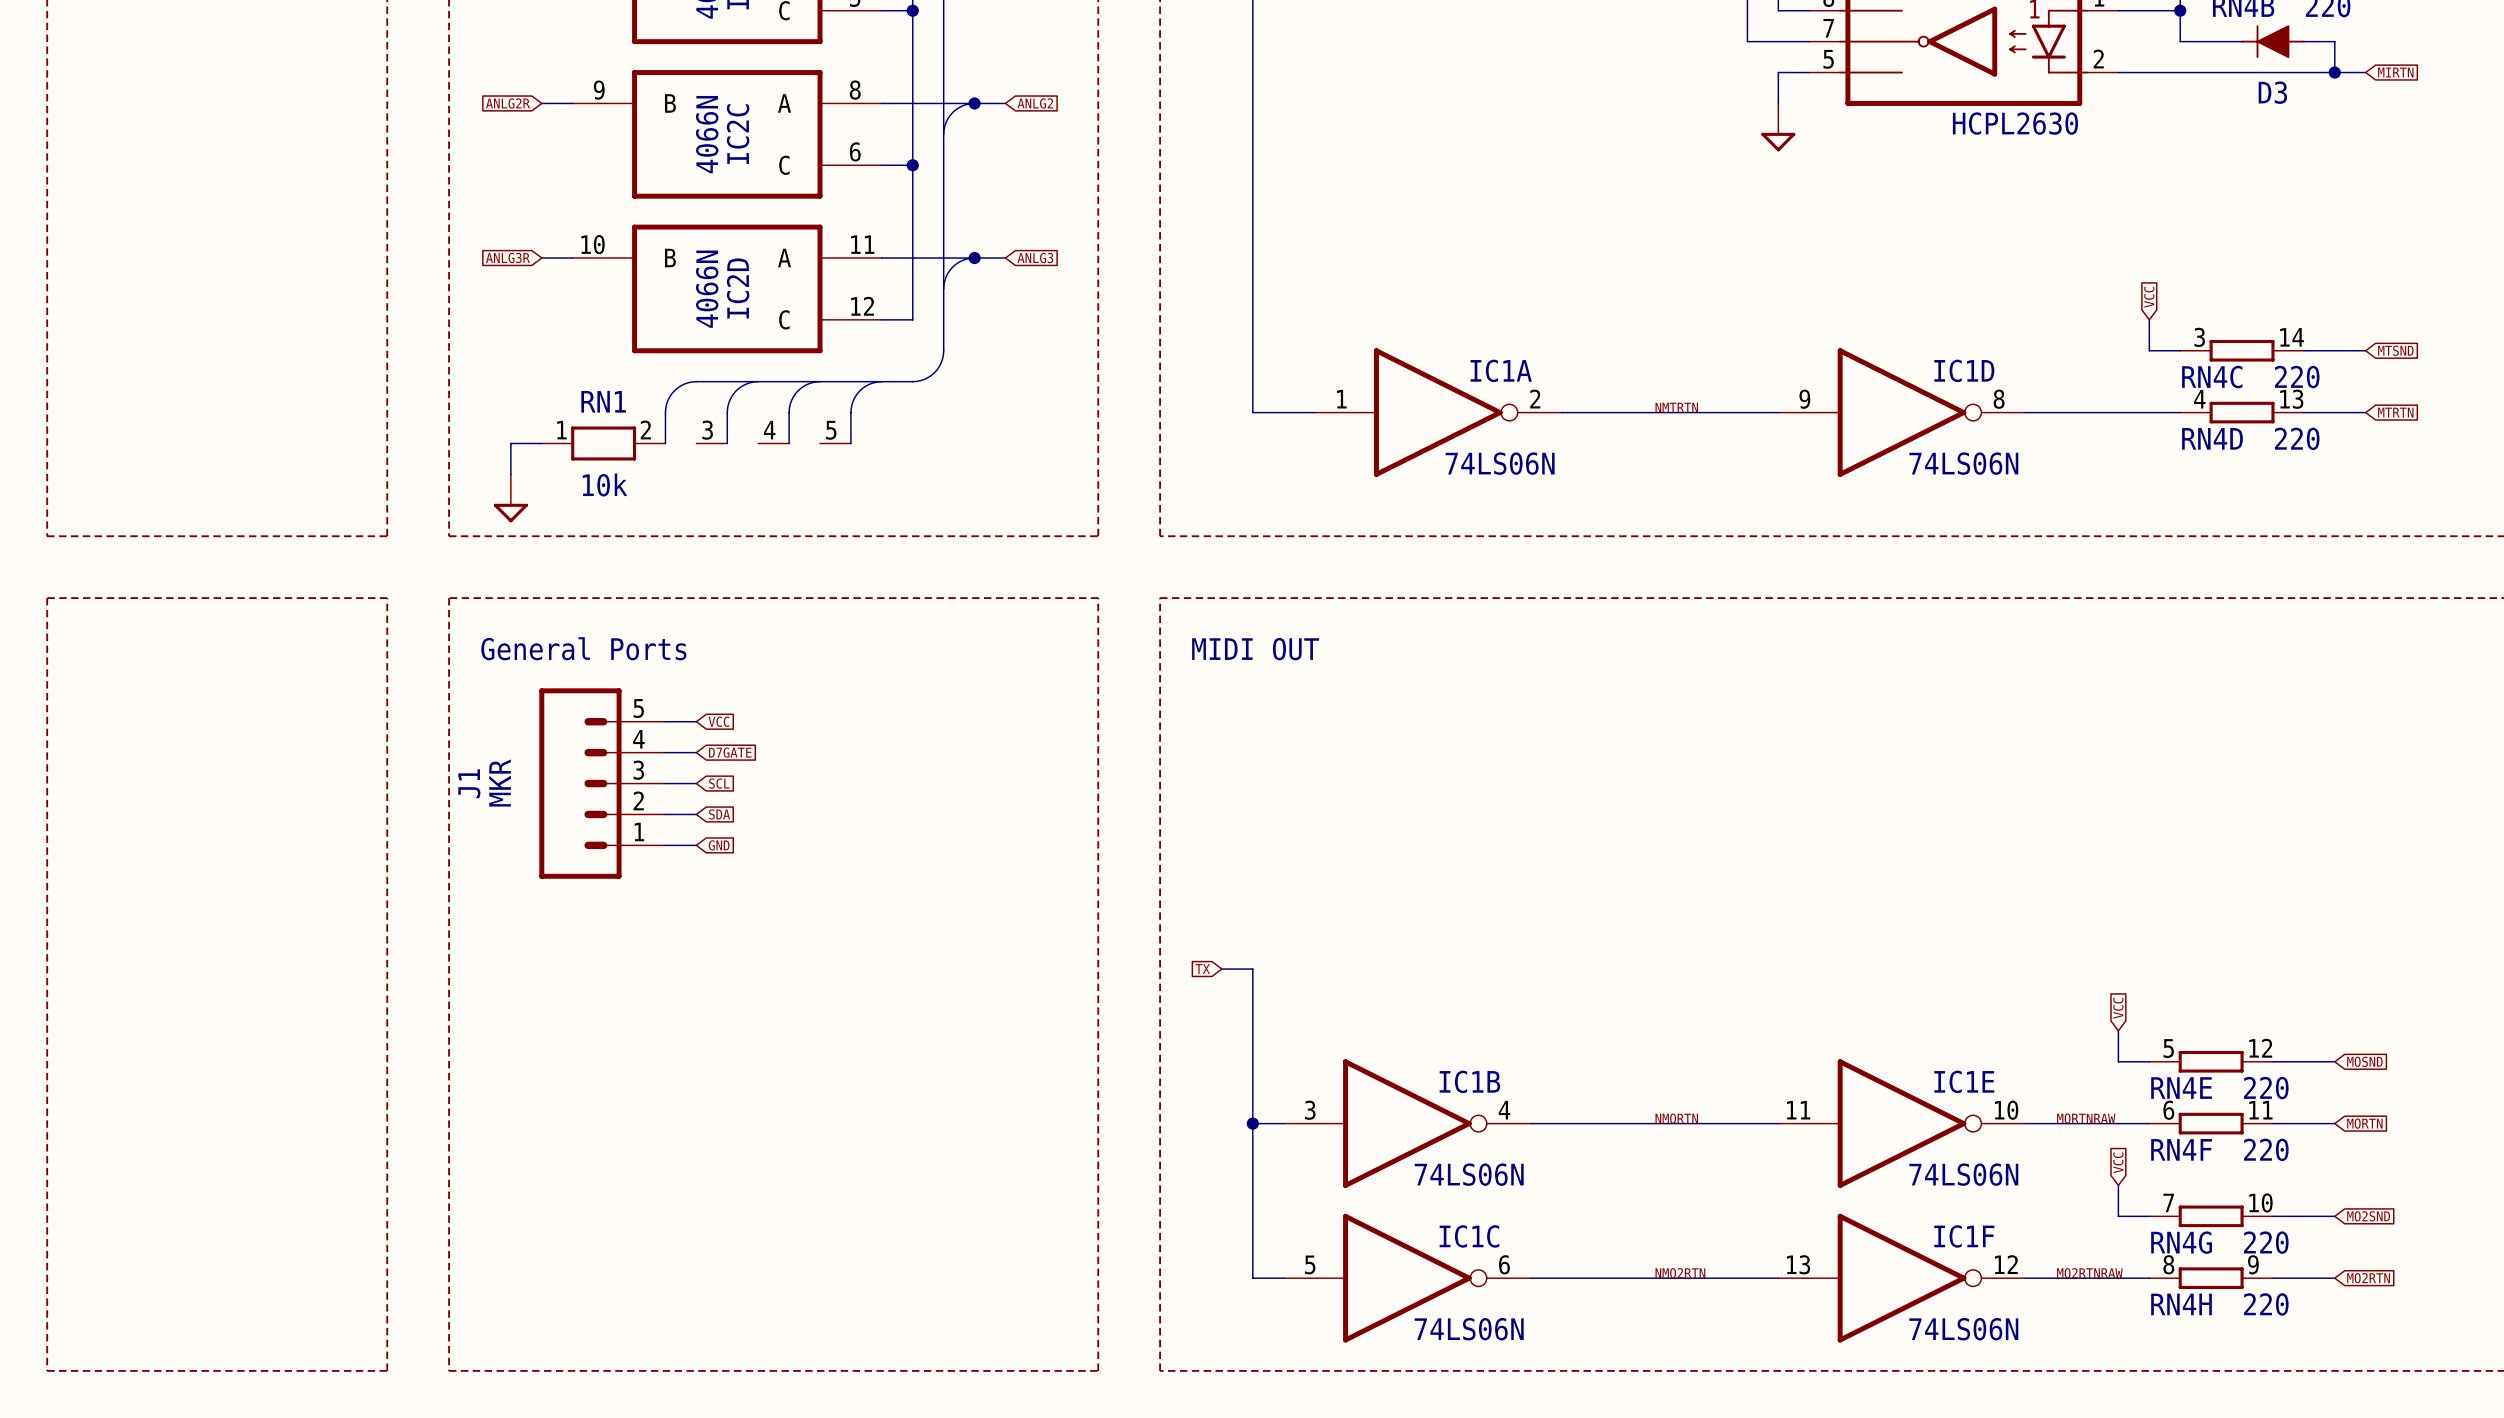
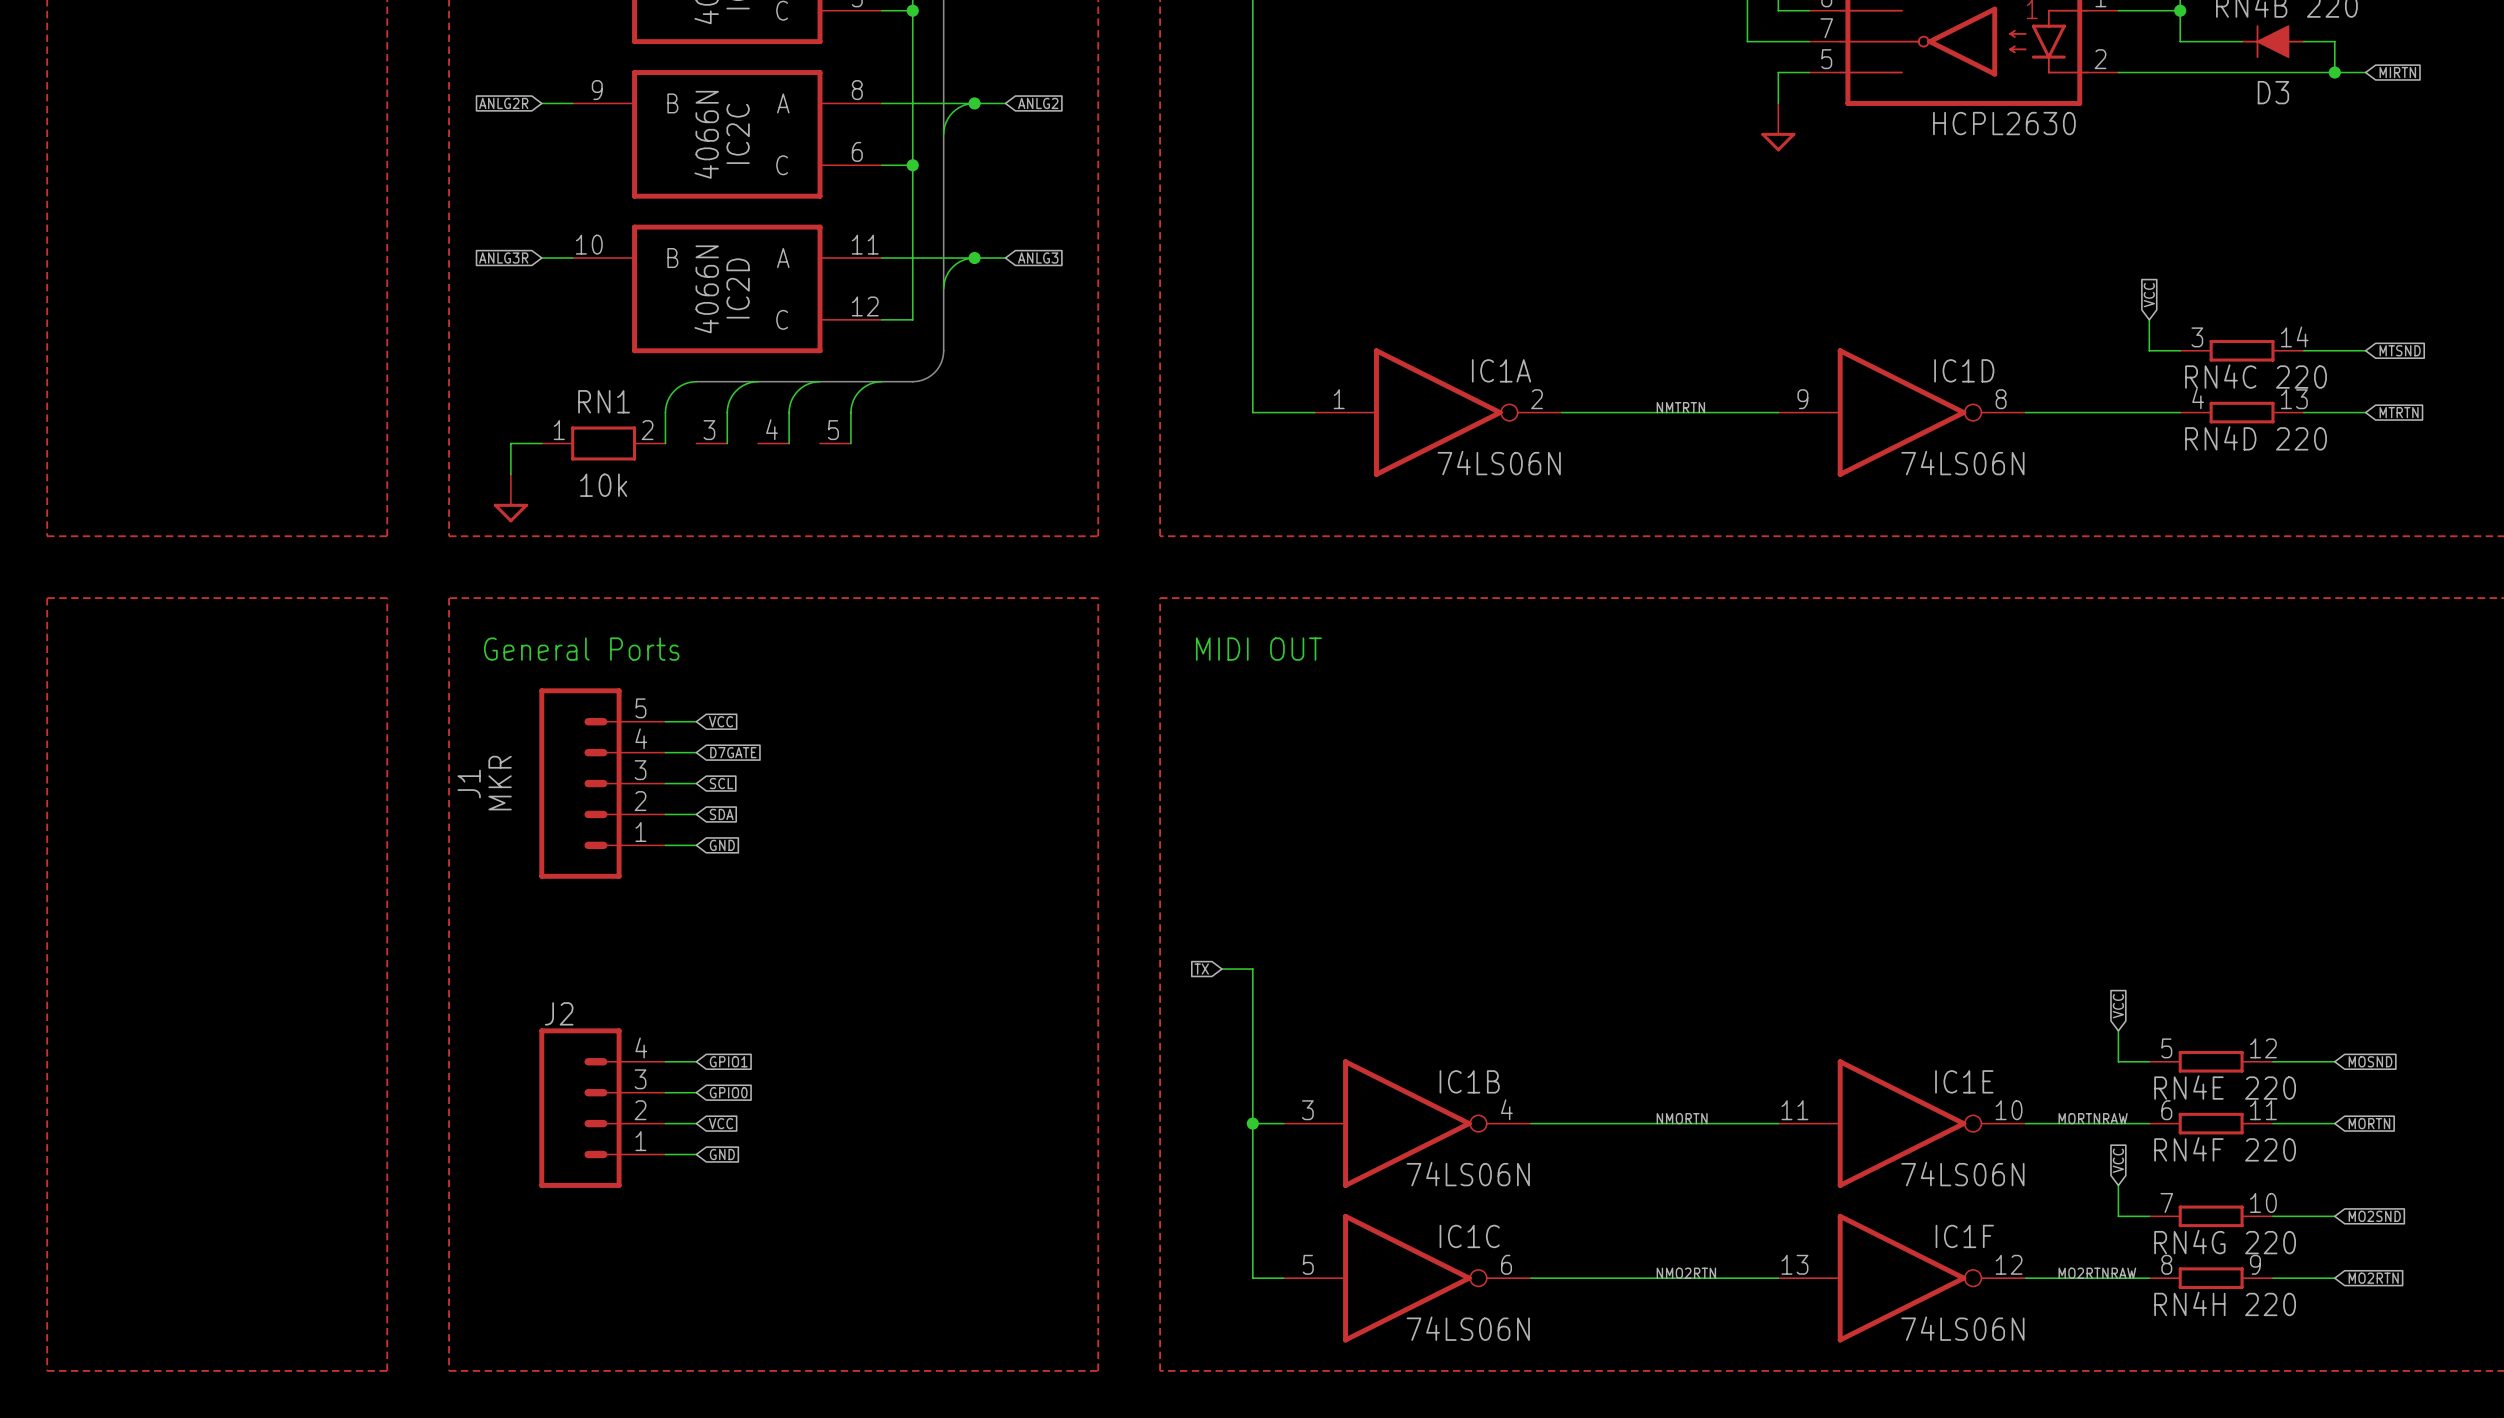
wire: none -> (665, 1061) (696, 1061)
global label: none -> GPIO1 (728, 1061)
wire: none -> (665, 1092) (696, 1092)
global label: none -> GPIO0 (728, 1092)
J2: none -> (602, 1108)
wire: none -> (665, 1123) (696, 1123)
global label: none -> VCC (721, 1123)
wire: none -> (665, 1154) (696, 1154)
global label: none -> GND (722, 1154)

